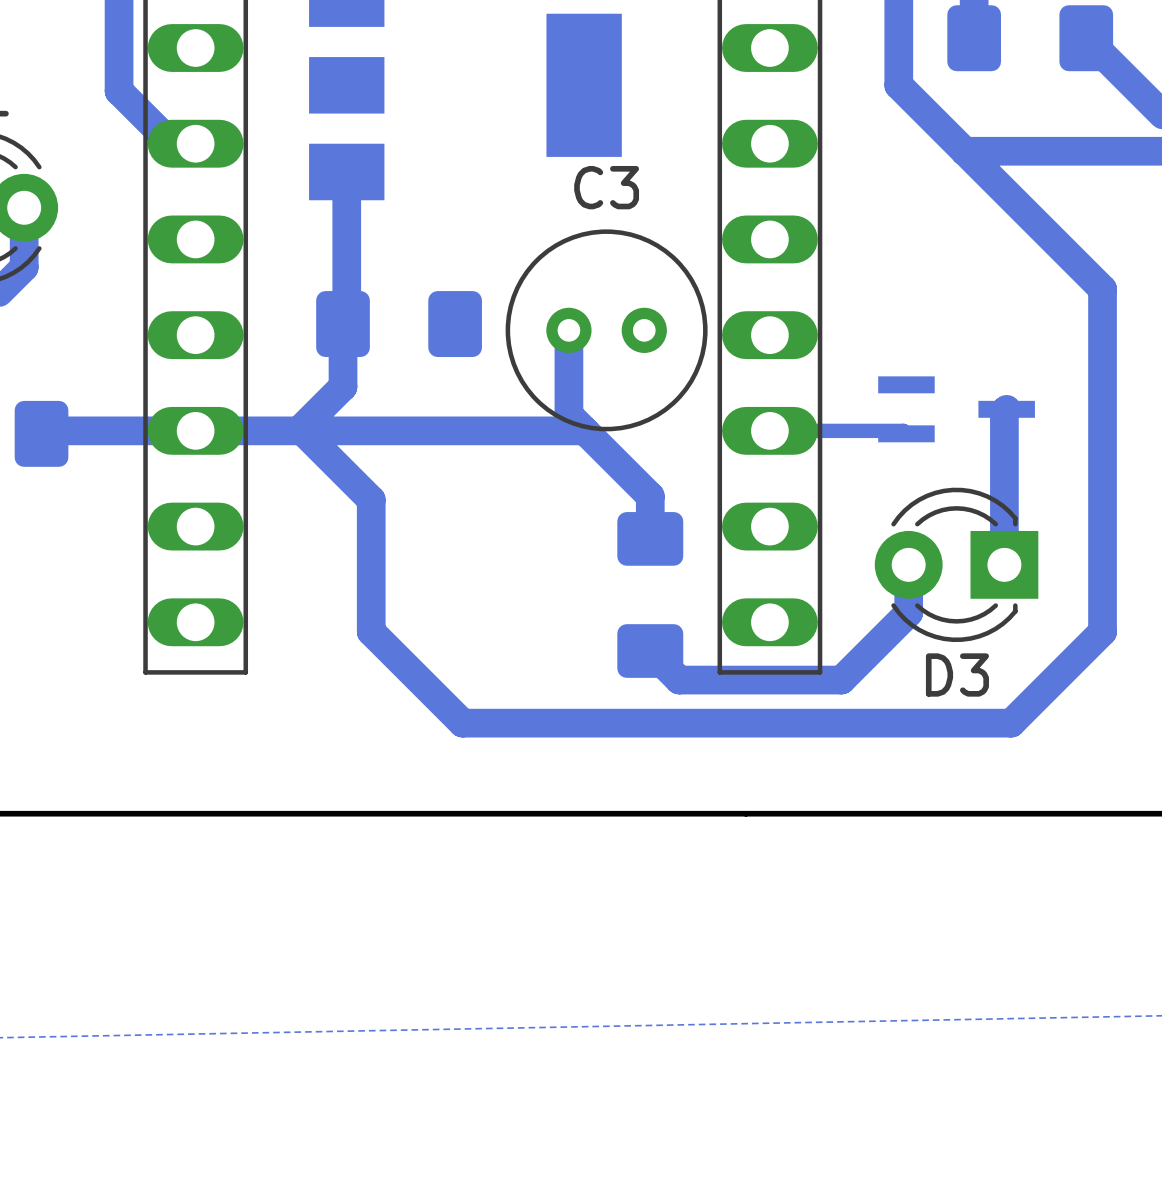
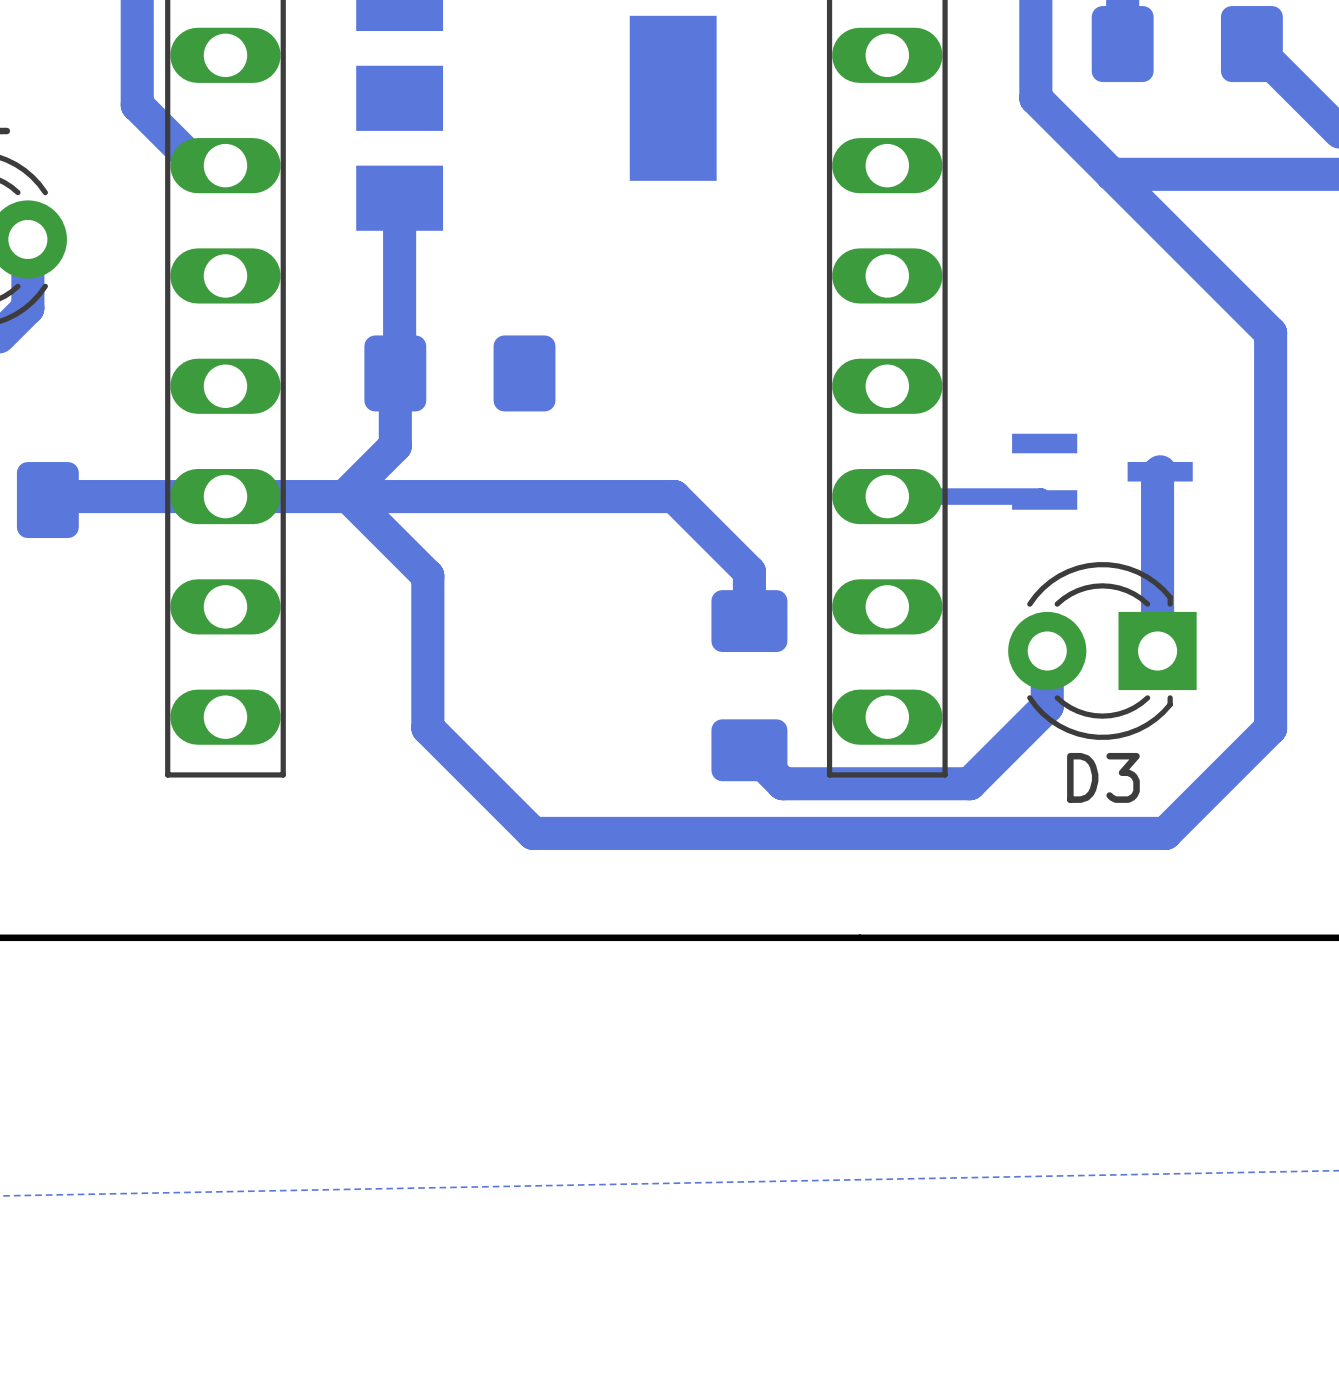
bottom track: (568, 330) (568, 414) (584, 430) -> none
C3: (606, 330) -> none

